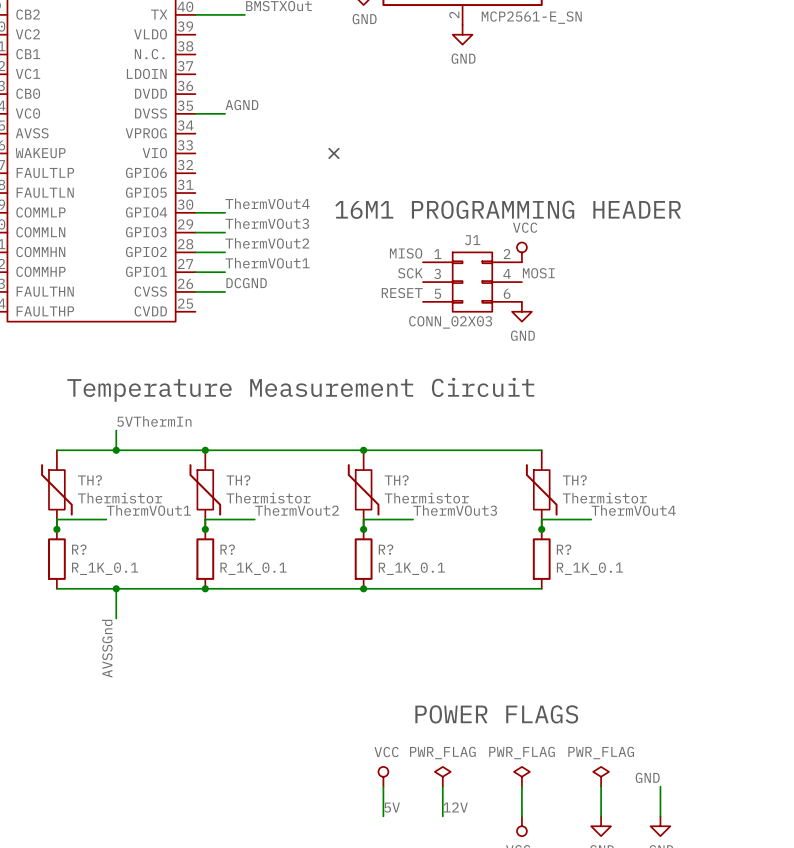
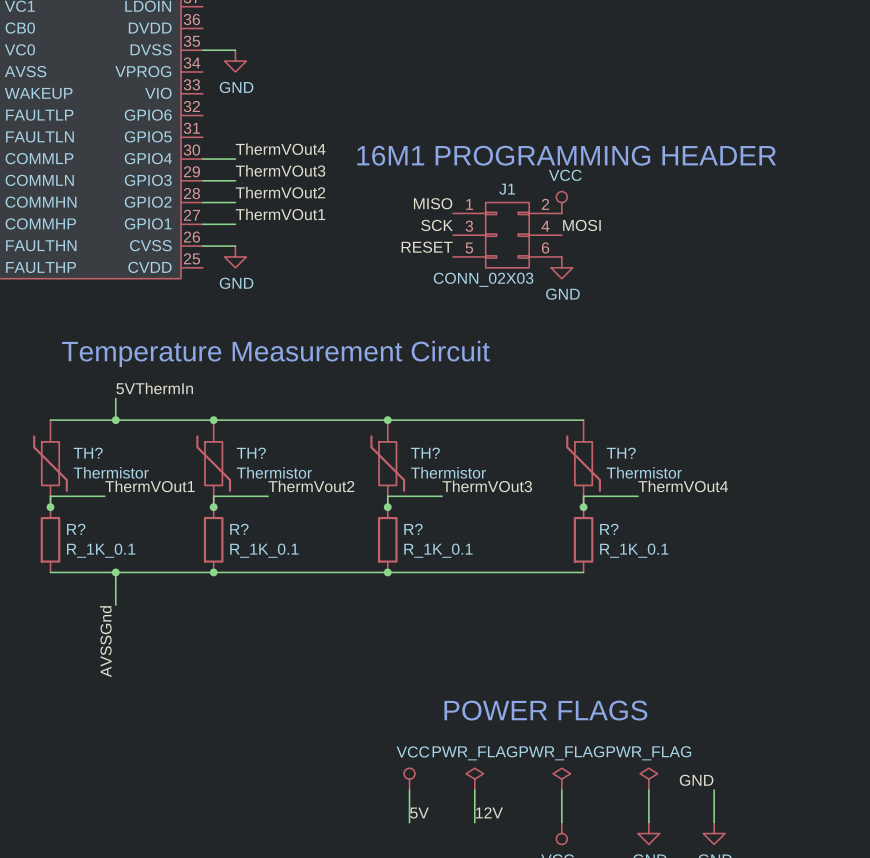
label: AGND (241, 105) -> none
power symbol: none -> GND (235, 61)
no-connect mark: (333, 153) -> none
label: DCGND (246, 283) -> none
power symbol: none -> GND (235, 256)

